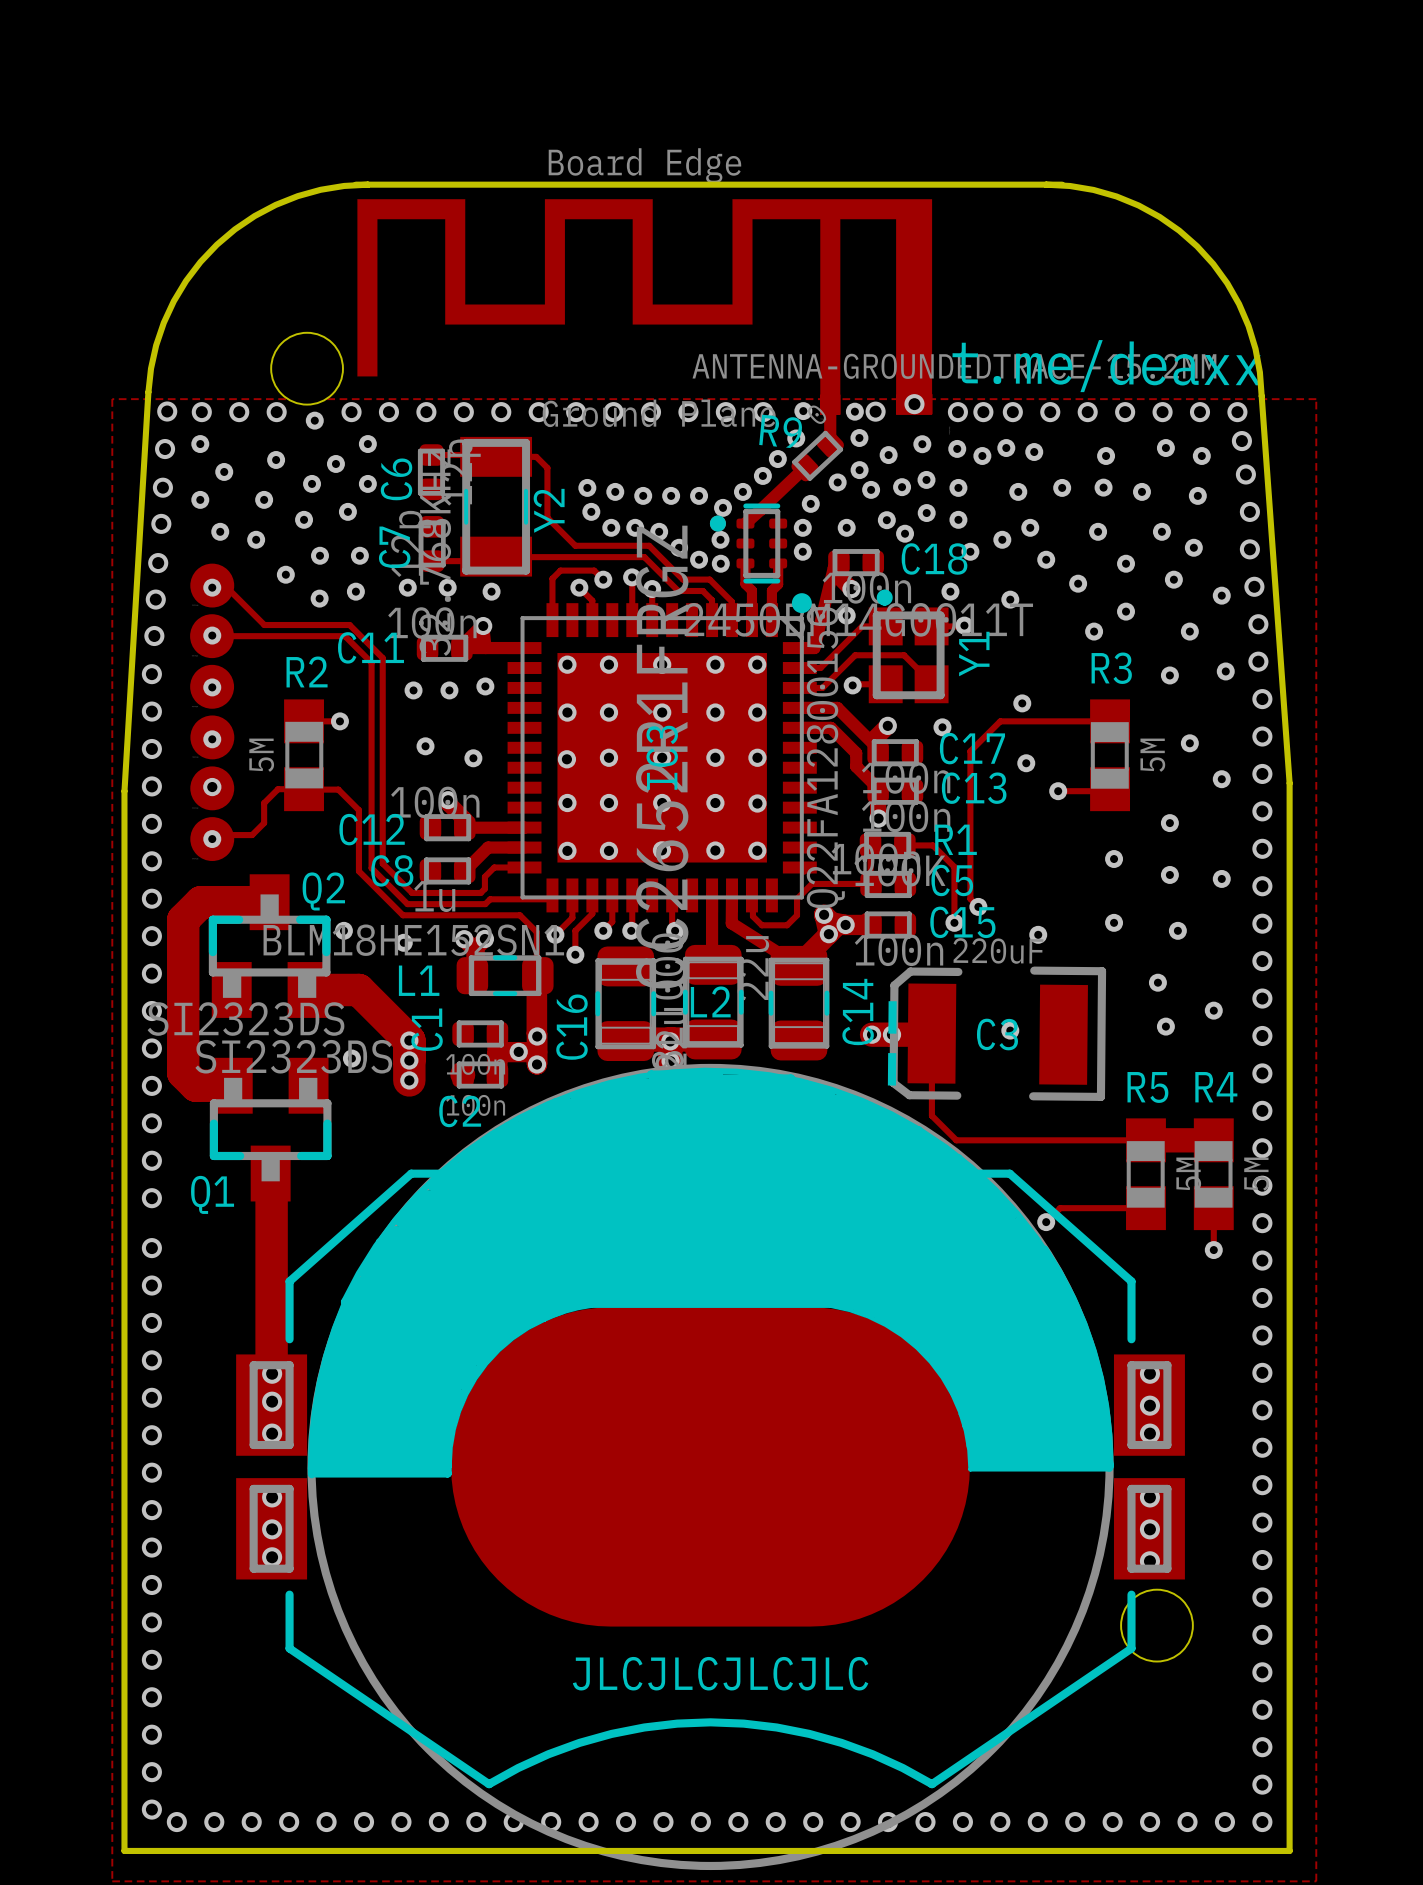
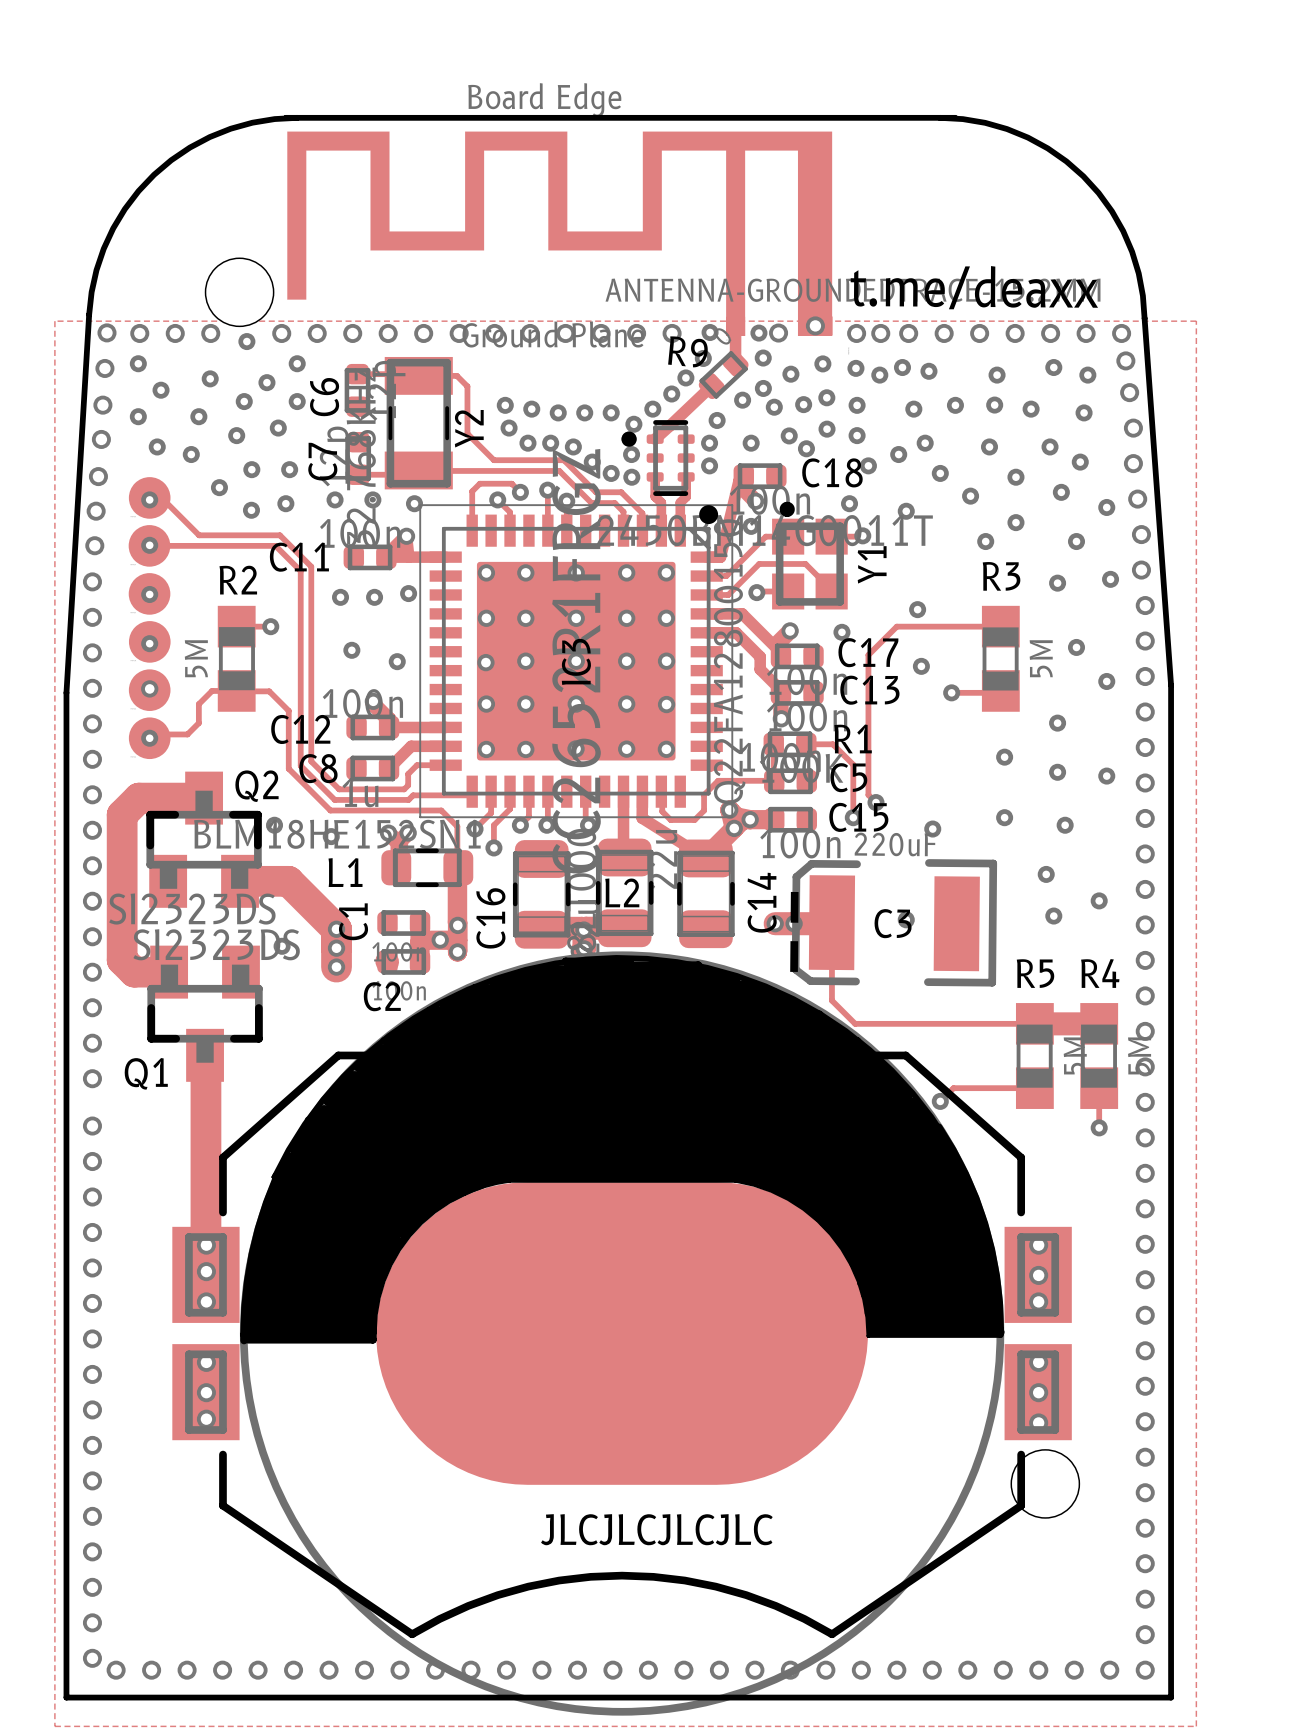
IC3 footprint: [507, 593, 817, 913] -> [419, 504, 734, 819]

